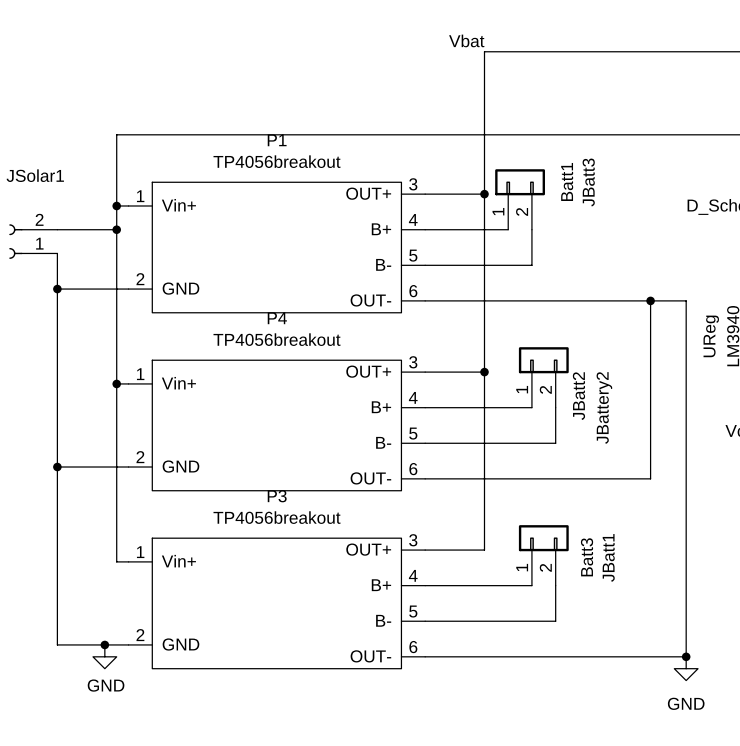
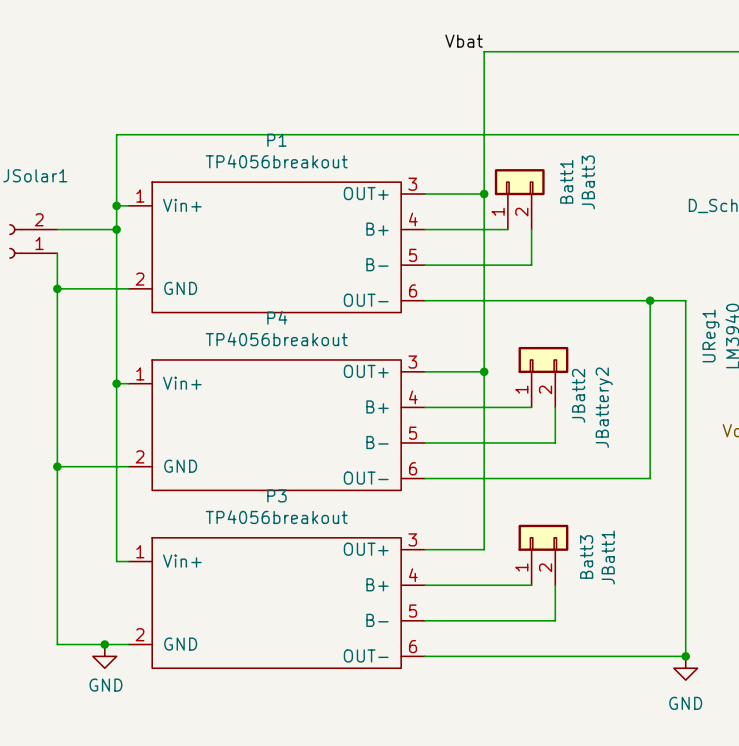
UReg name: UReg (711, 336) -> UReg1 (710, 335)

